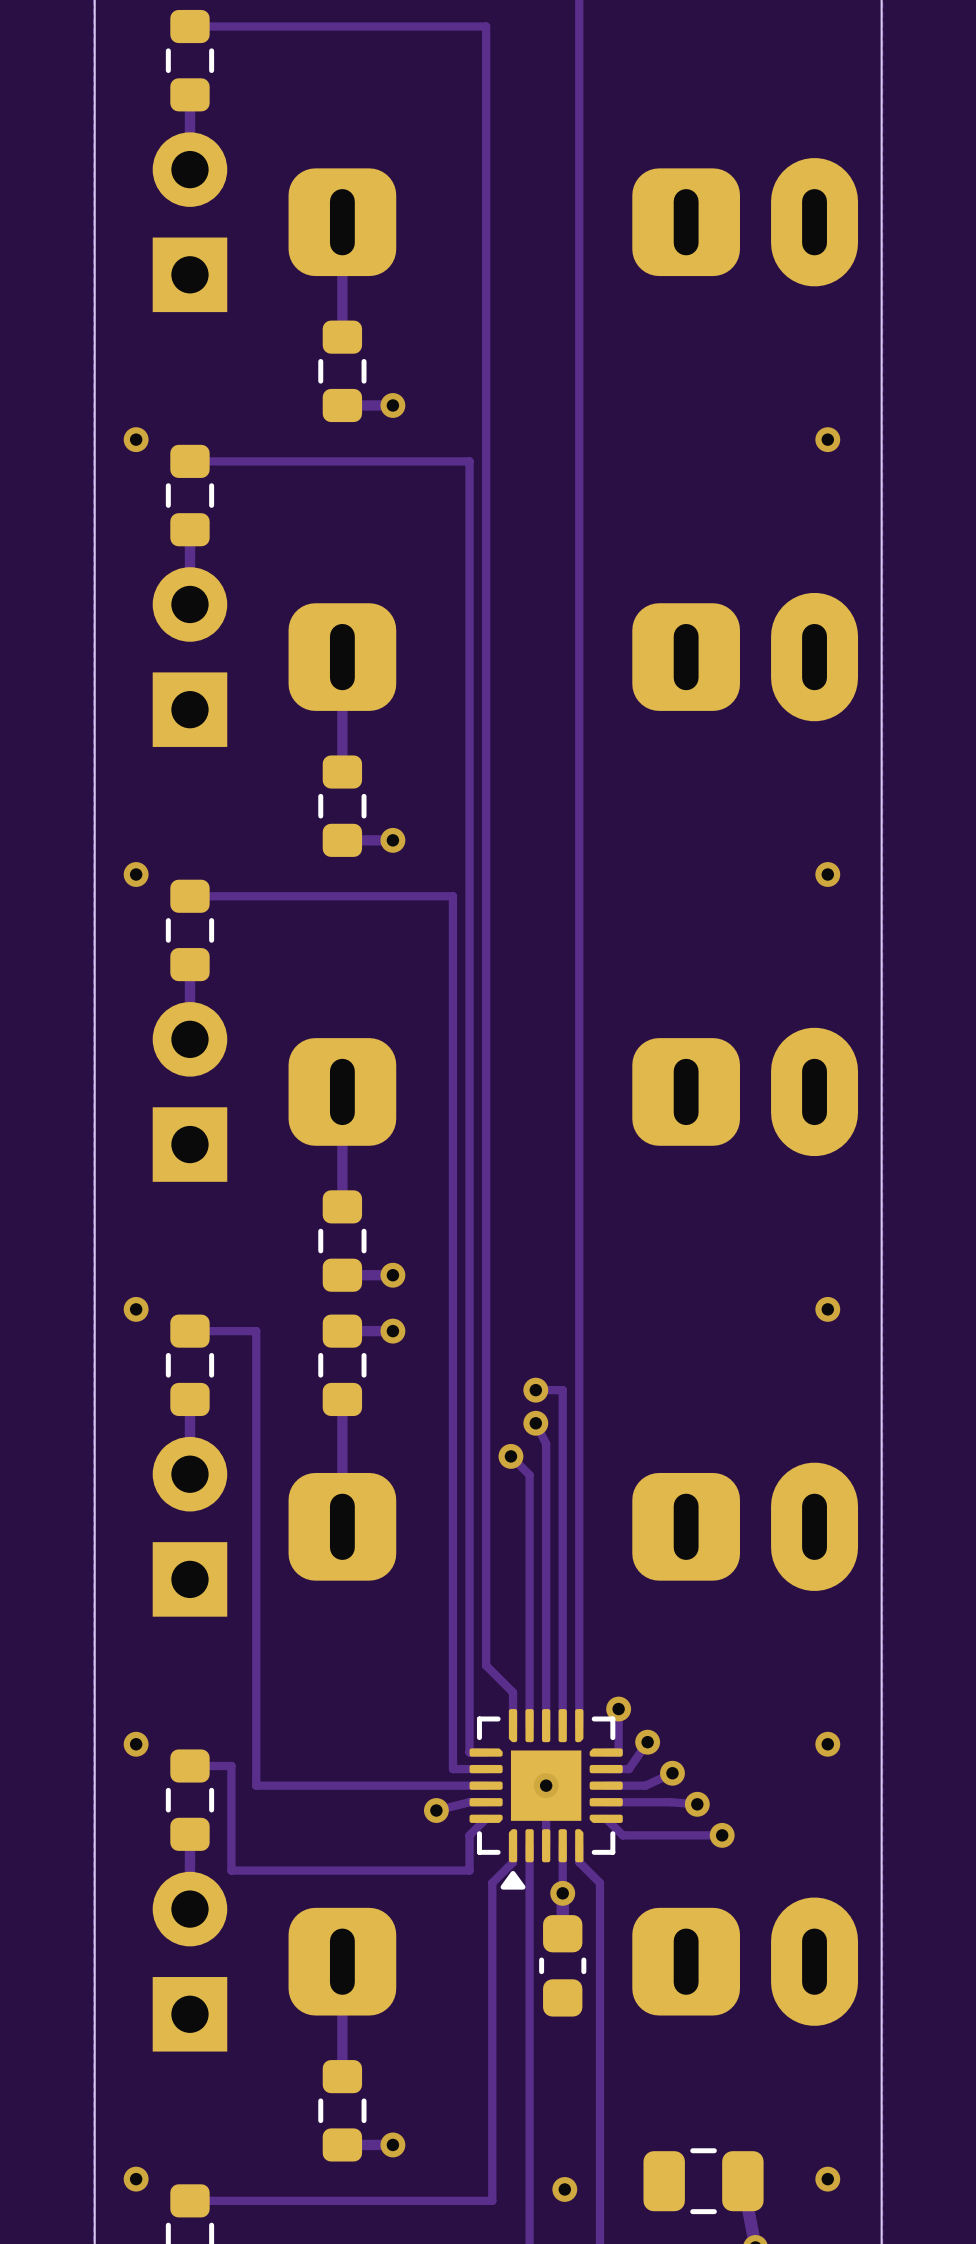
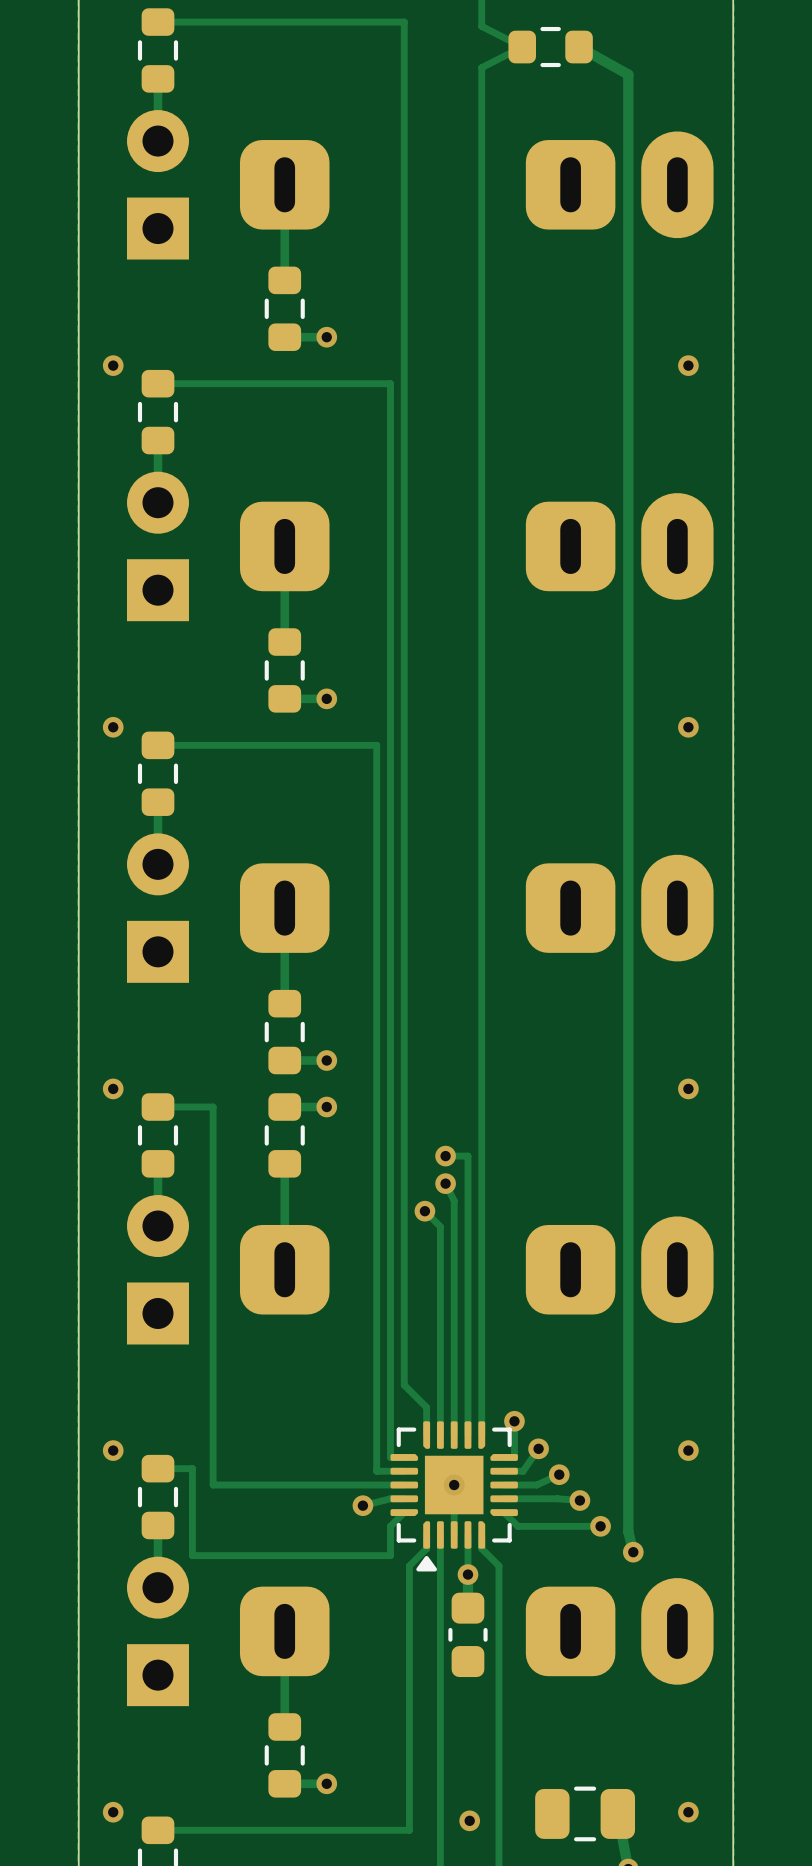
track: (579, 31) (579, 81) -> (481, 26) (522, 47) (481, 67)
part: none -> (550, 47)
track: none -> (579, 47) (628, 74) (628, 1531) (633, 1552)
via: none -> (633, 1552)

